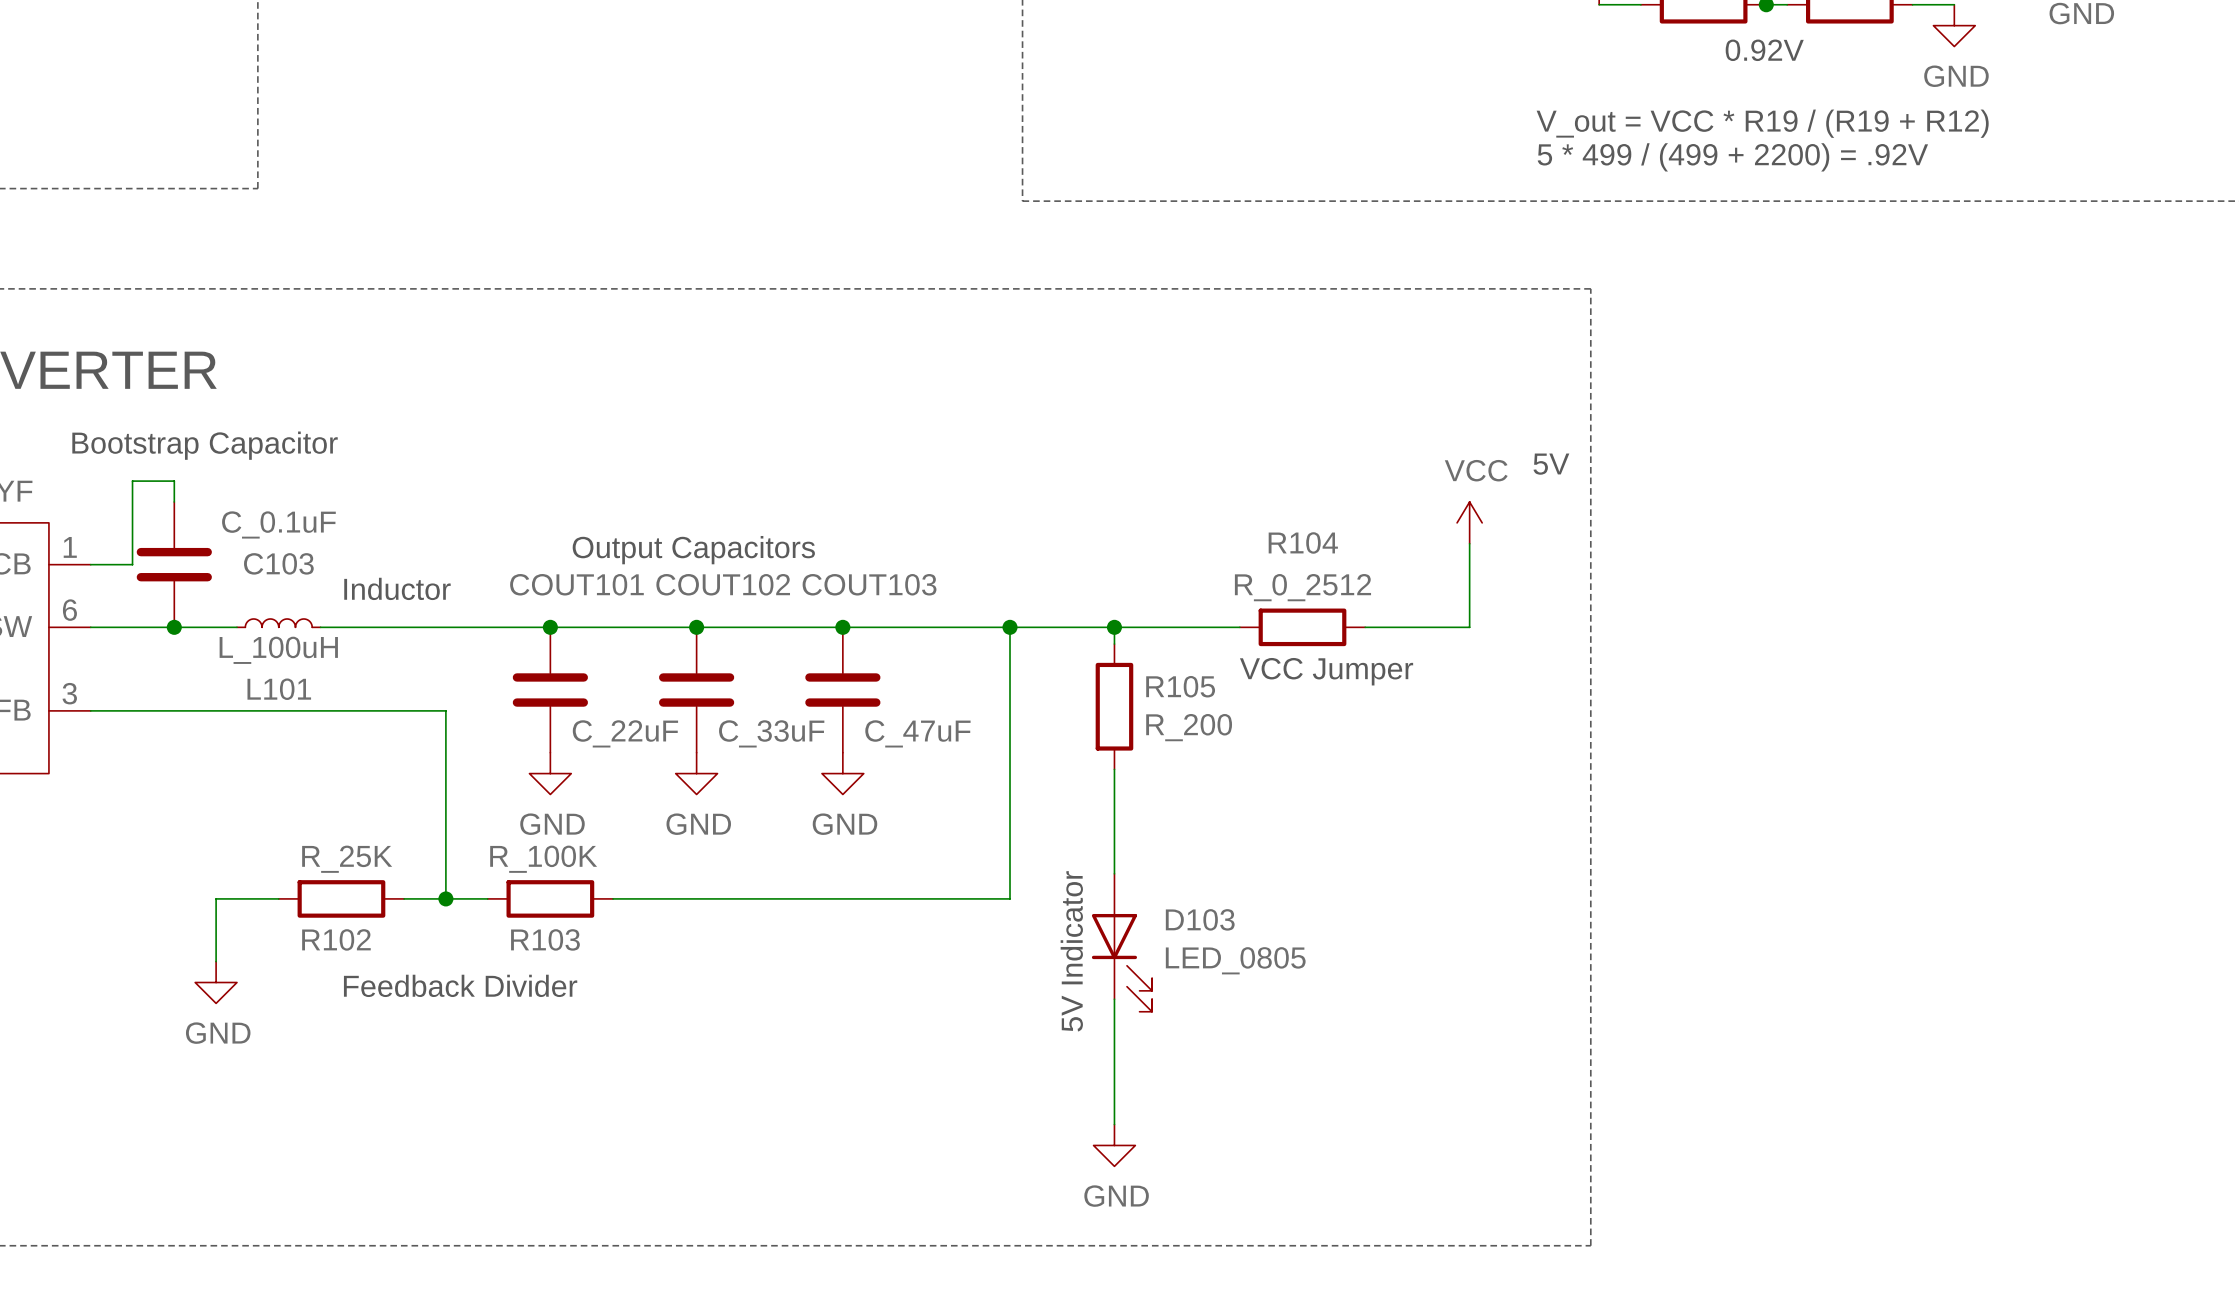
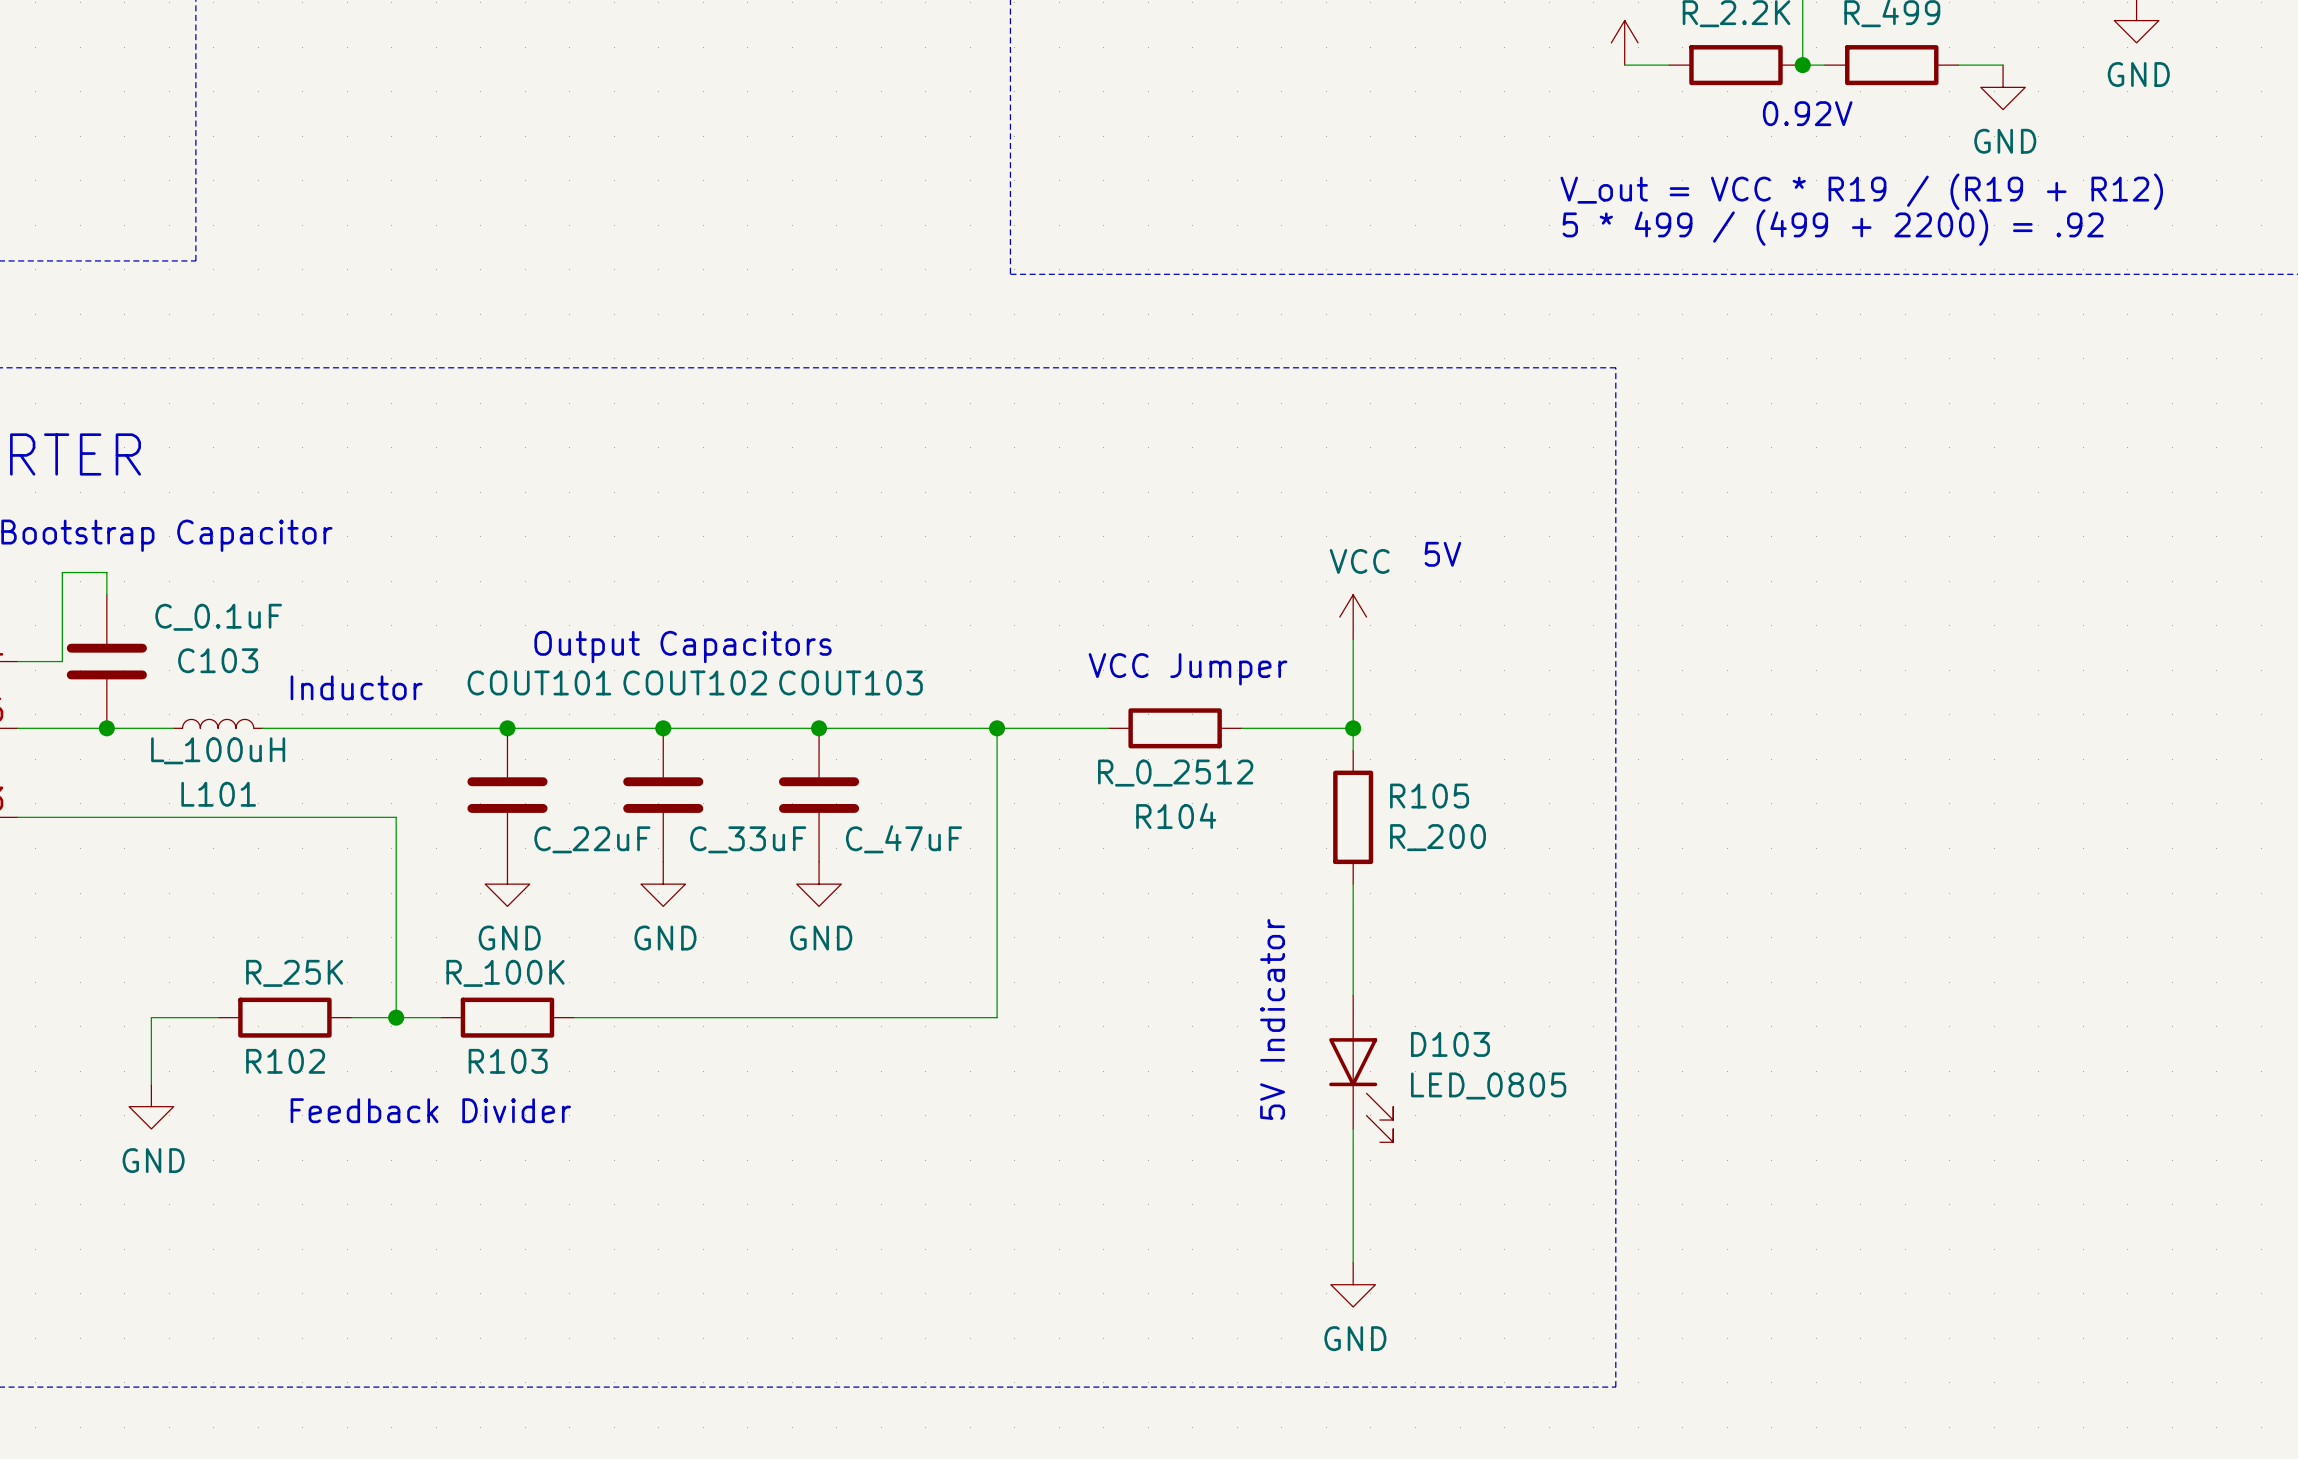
text: 5 * 499 / (499 + 2200) = .92V (1732, 157) -> 5 * 499 / (499 + 2200) = .92 (1833, 227)
text position: 5V (1551, 464) -> 5V (1442, 554)
power symbol position: VCC (1469, 522) -> VCC (1353, 617)
R104 name position: R104 (1303, 542) -> R104 (1176, 815)
wire: none -> (1353, 639) (1353, 750)
wire: (1469, 543) (1469, 627) (1365, 627) -> none
R104 value position: R_0_2512 (1302, 587) -> R_0_2512 (1175, 773)
junction: (1114, 627) -> none
wire: (1239, 627) (1114, 627) (1114, 644) -> (1241, 728) (1353, 728)
R104 position: (1302, 627) -> (1175, 728)
junction: none -> (1353, 728)
text position: VCC Jumper (1326, 671) -> VCC Jumper (1188, 669)
R105 position: (1114, 706) -> (1353, 817)
wire: (1114, 769) (1114, 873) -> (1353, 884) (1353, 995)
D103 position: (1121, 942) -> (1361, 1068)
text position: 5V Indicator (1071, 951) -> 5V Indicator (1272, 1019)
wire: (1114, 999) (1114, 1124) -> (1353, 1128) (1353, 1262)
power symbol position: GND (1114, 1145) -> GND (1353, 1284)

